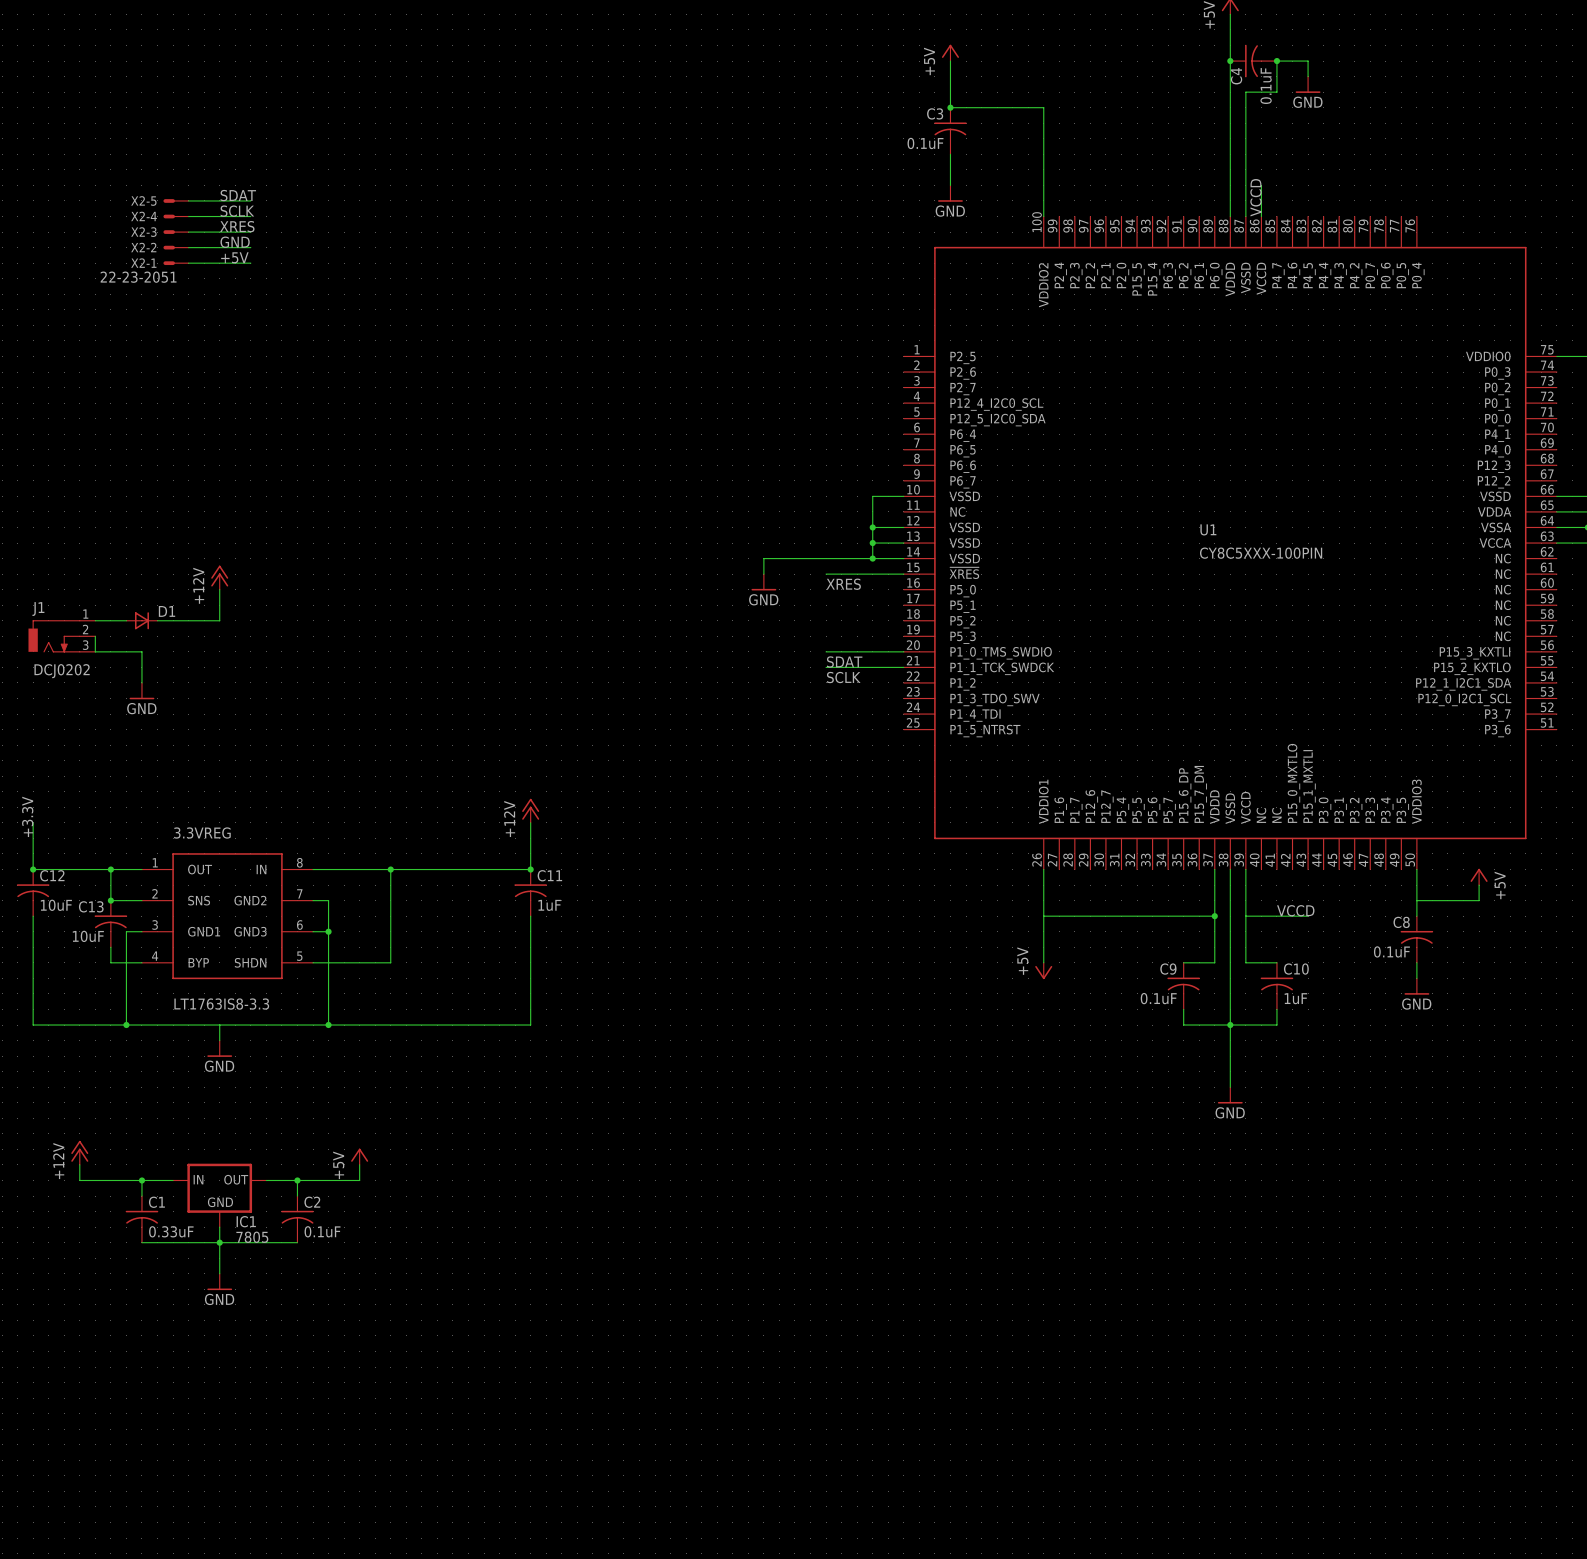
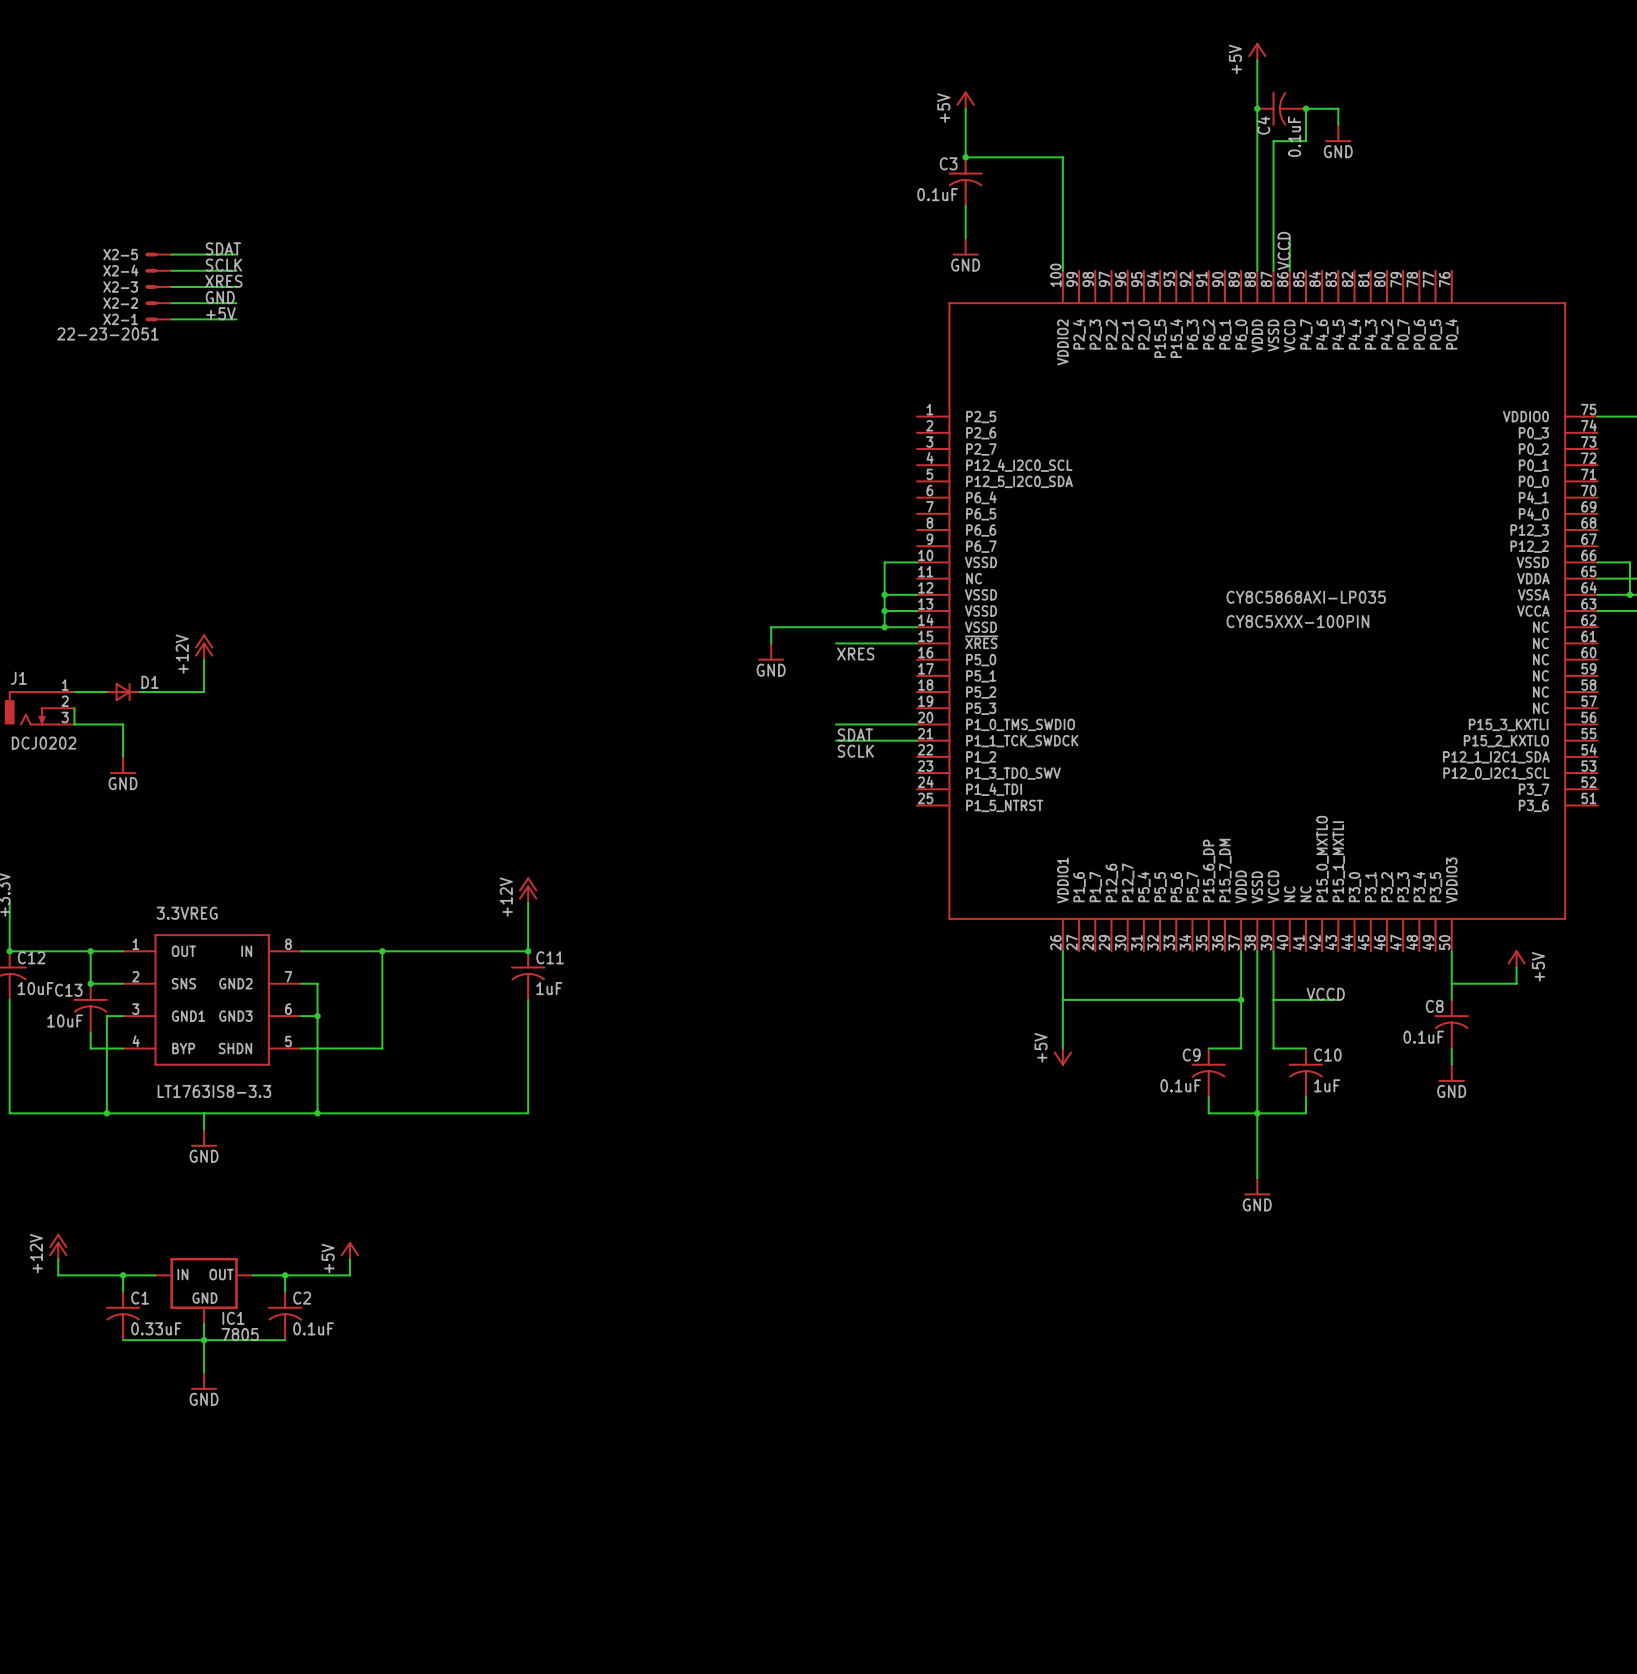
U1 name: U1 (1208, 529) -> CY8C5868AXI-LP035 (1306, 597)

